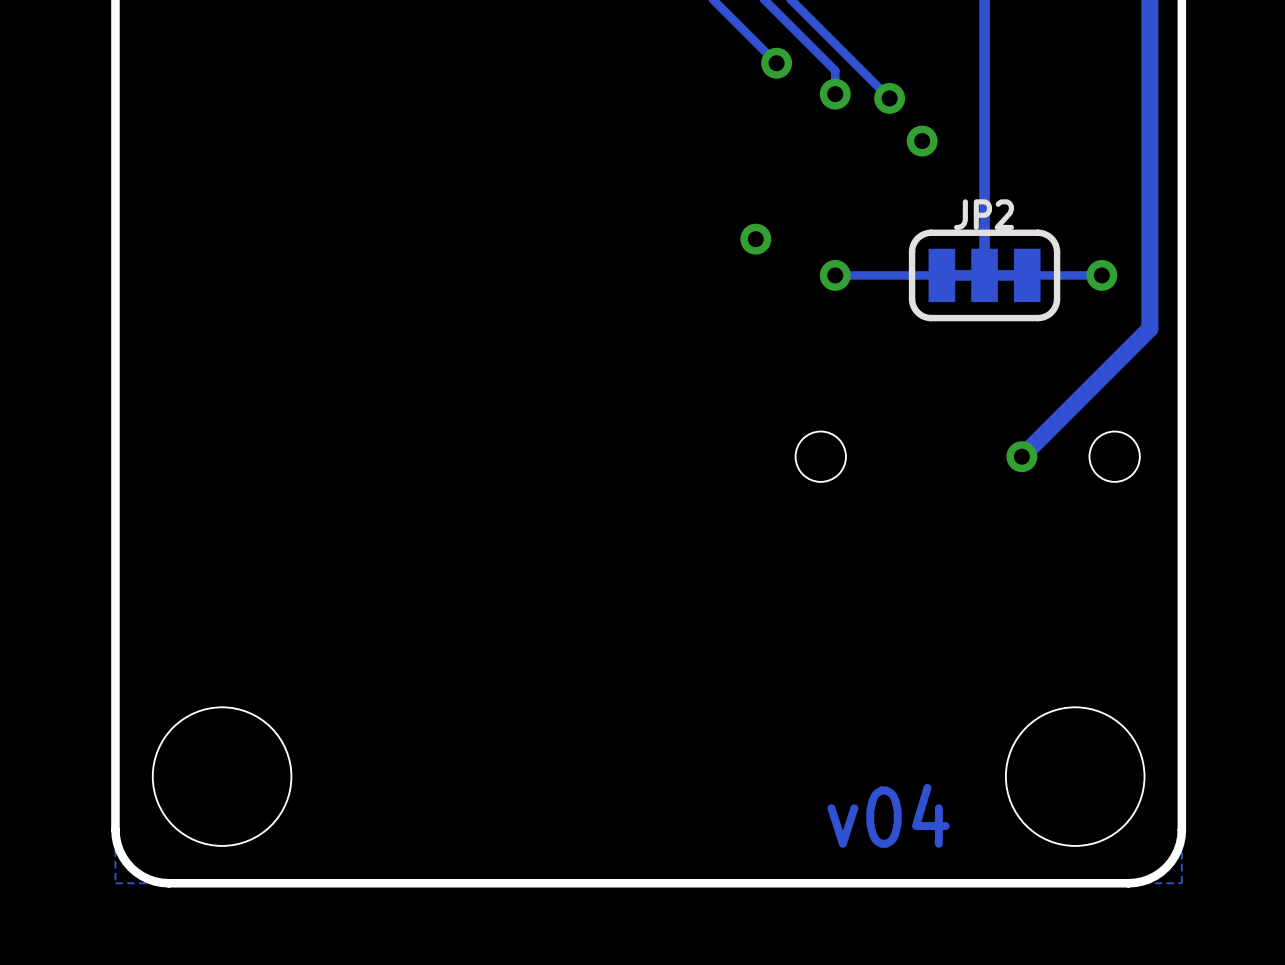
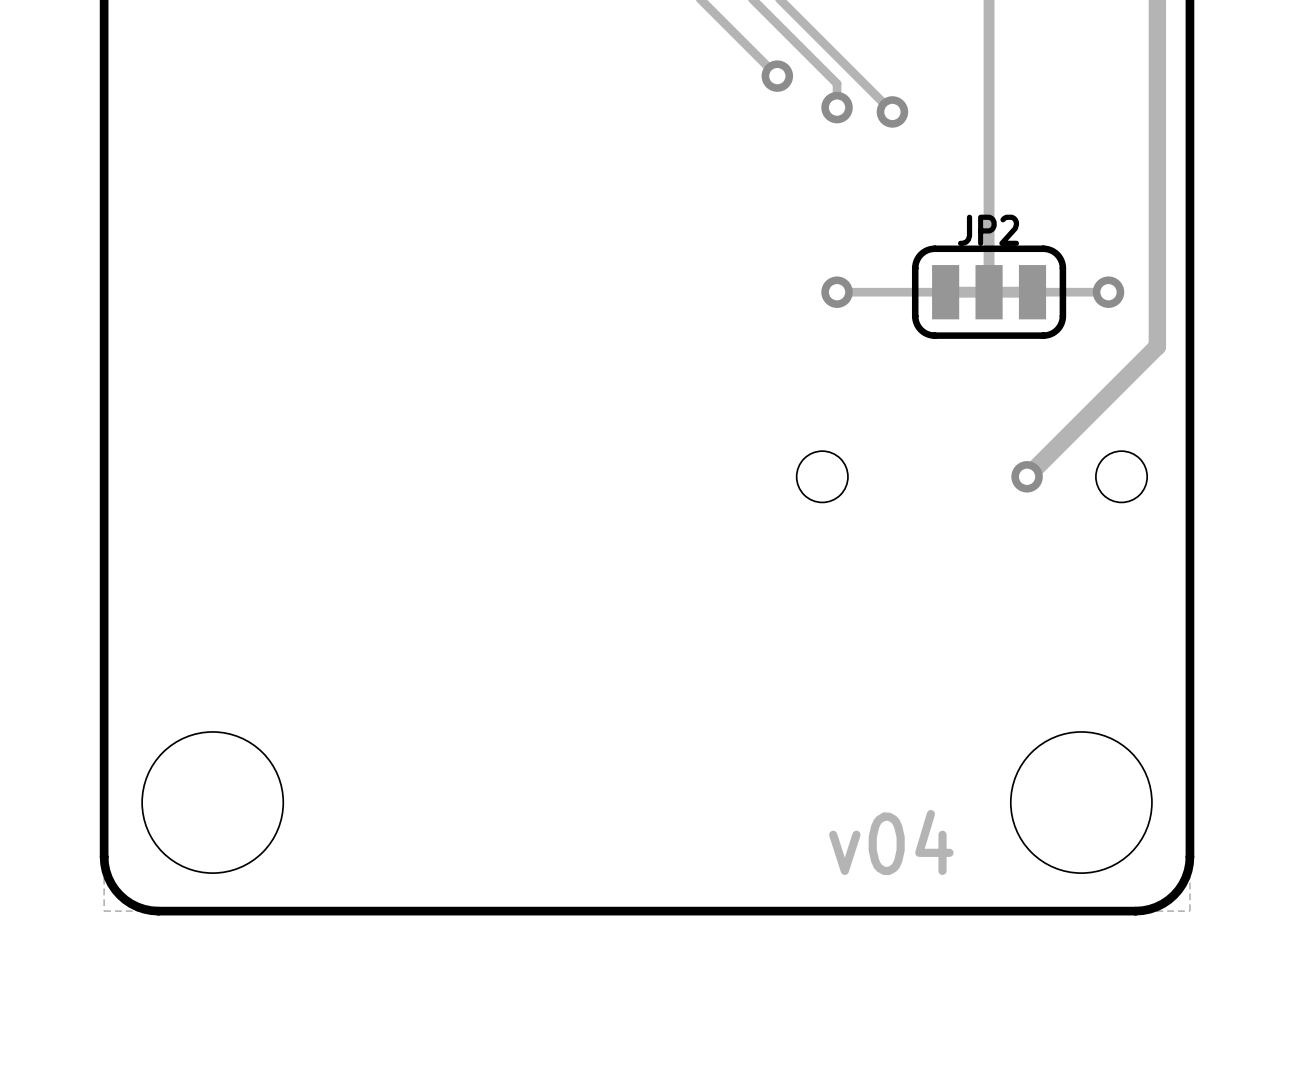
via: (922, 141) -> none
via: (755, 239) -> none

